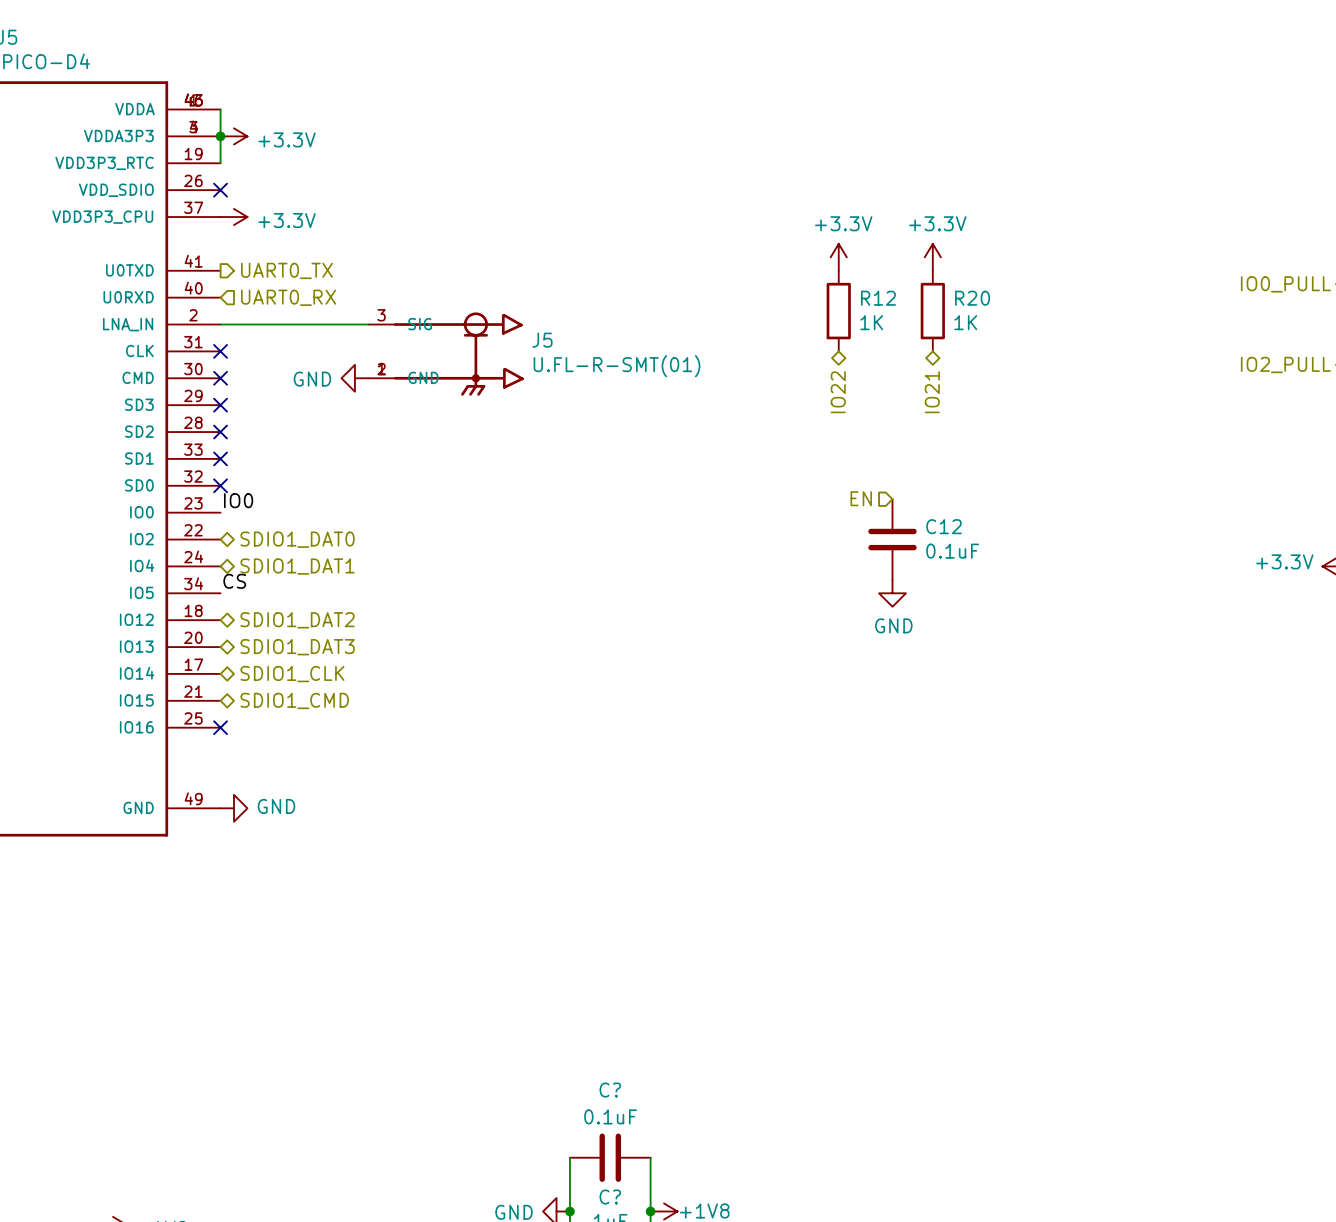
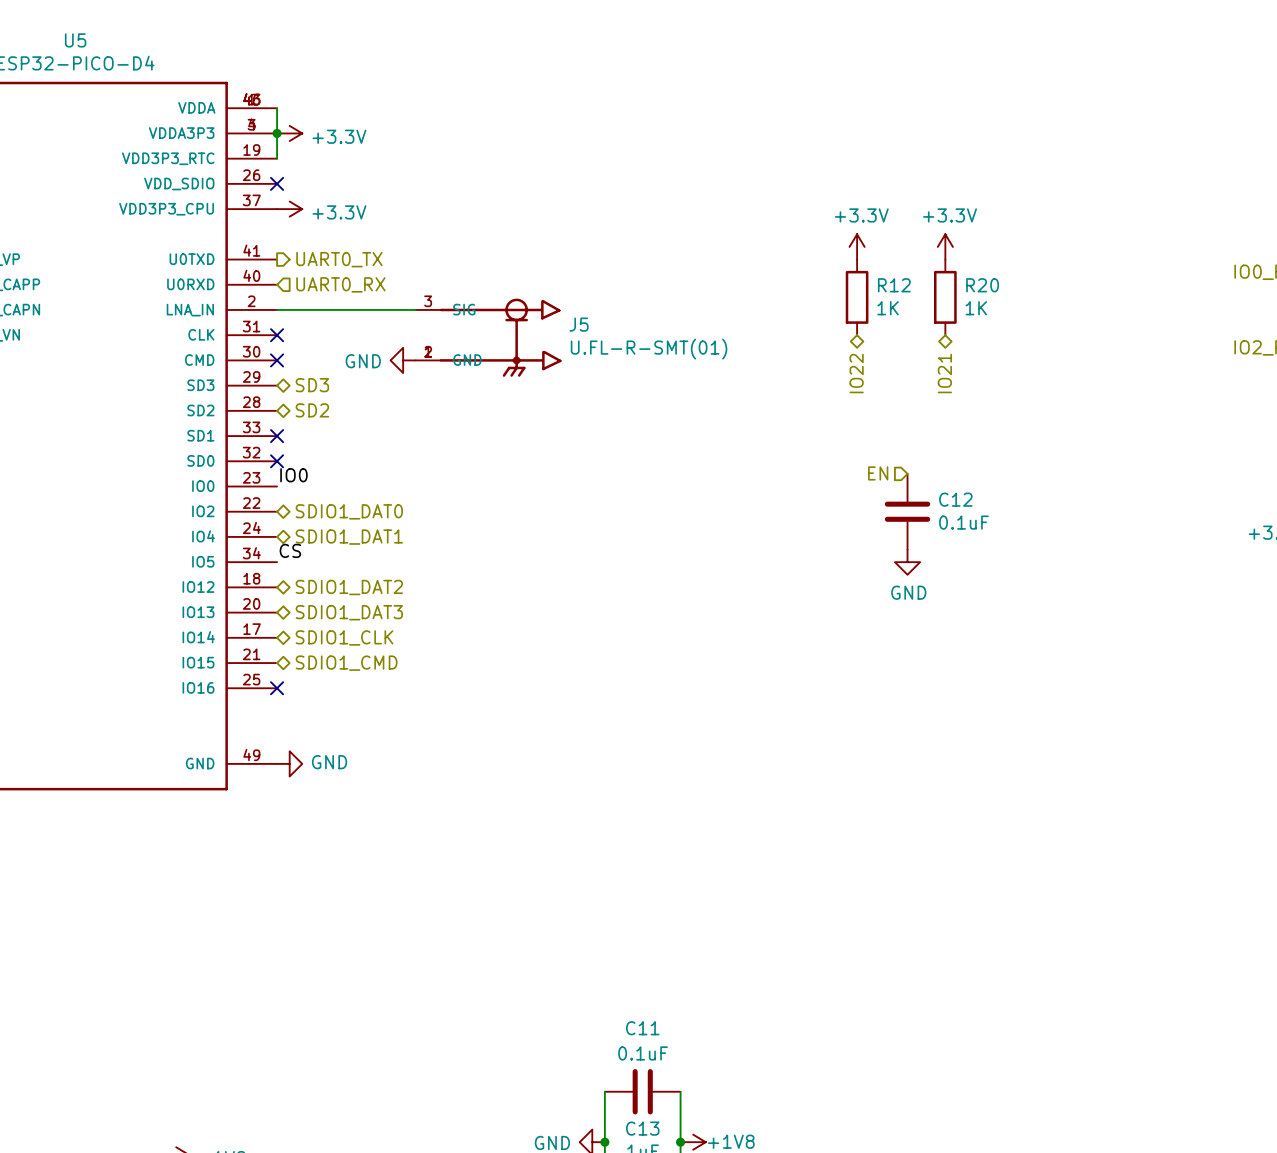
hierarchical label: none -> SD3 (312, 385)
no-connect mark: (220, 405) -> none
hierarchical label: none -> SD2 (312, 410)
no-connect mark: (220, 432) -> none
C? name: C? (610, 1090) -> C11 (642, 1028)
C? name: C? (610, 1197) -> C13 (642, 1128)

